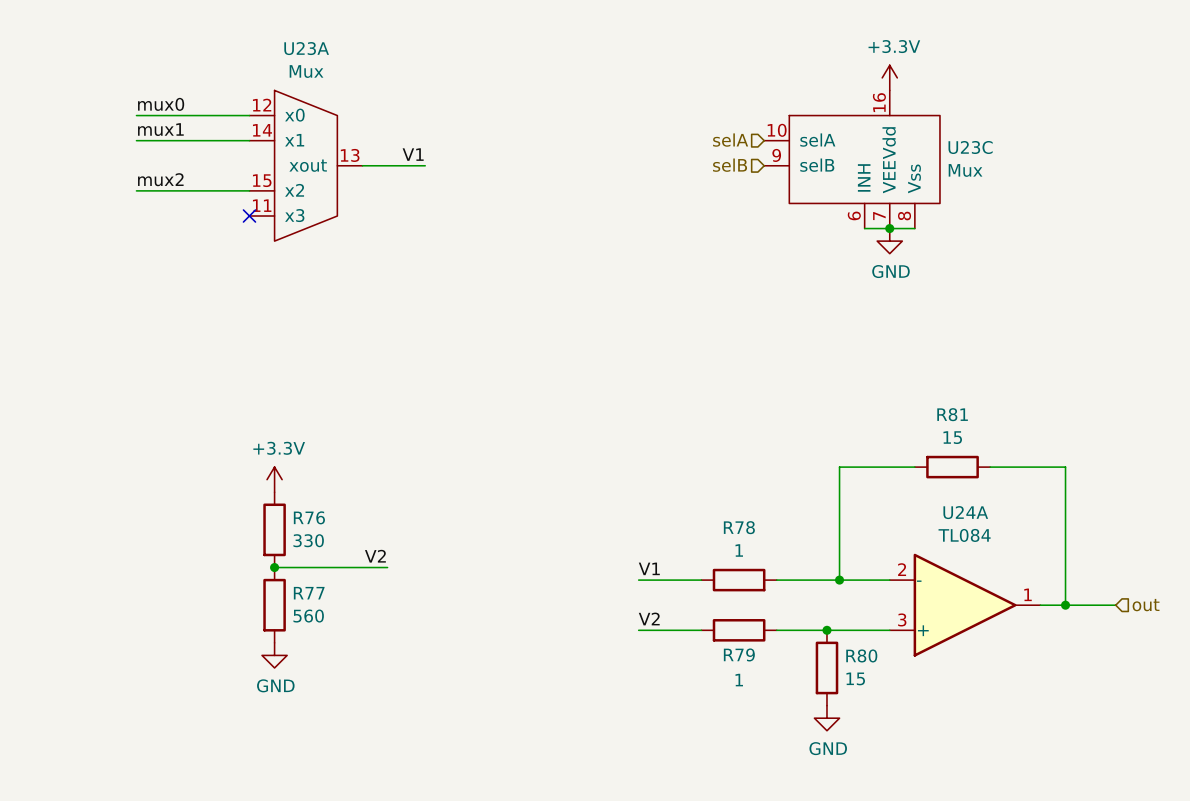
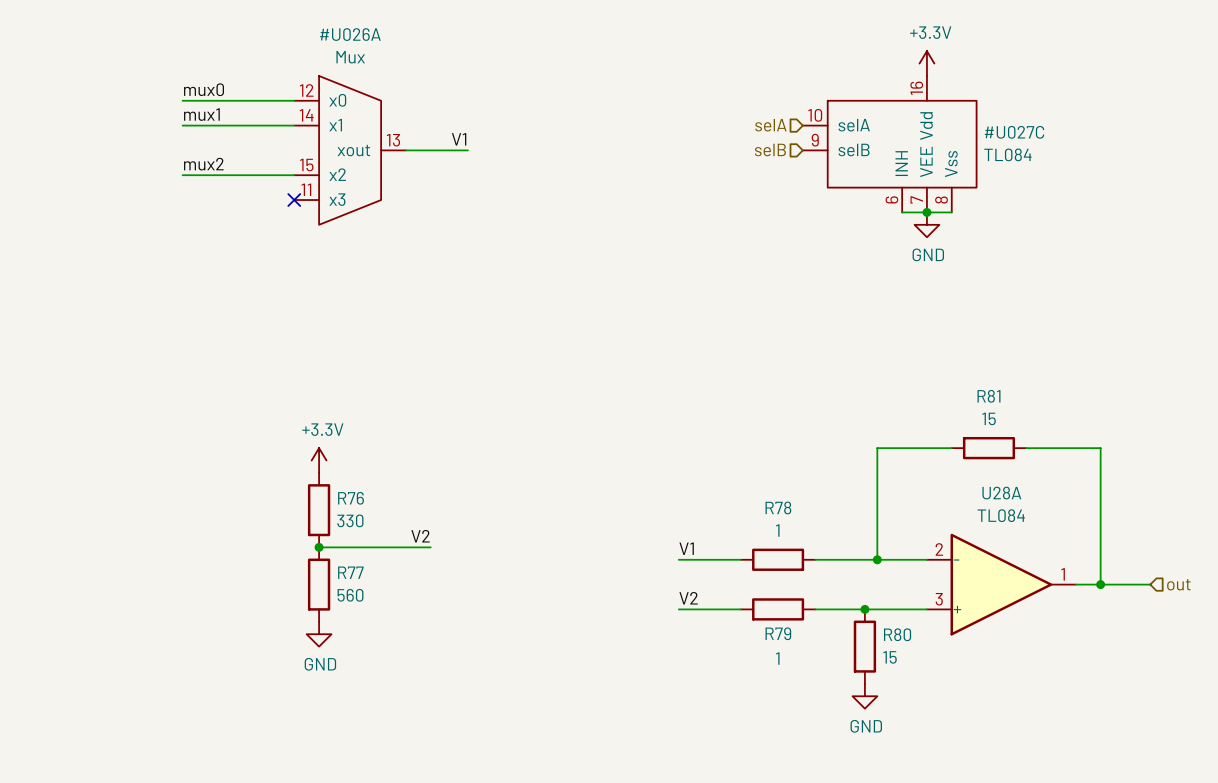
U23C: Mux (852, 159) -> none
#U027C: none -> TL084 (889, 144)
U23A: Mux (305, 165) -> none
#U026A: none -> Mux (350, 150)
U24A name: U24A (965, 512) -> U28A (1001, 493)

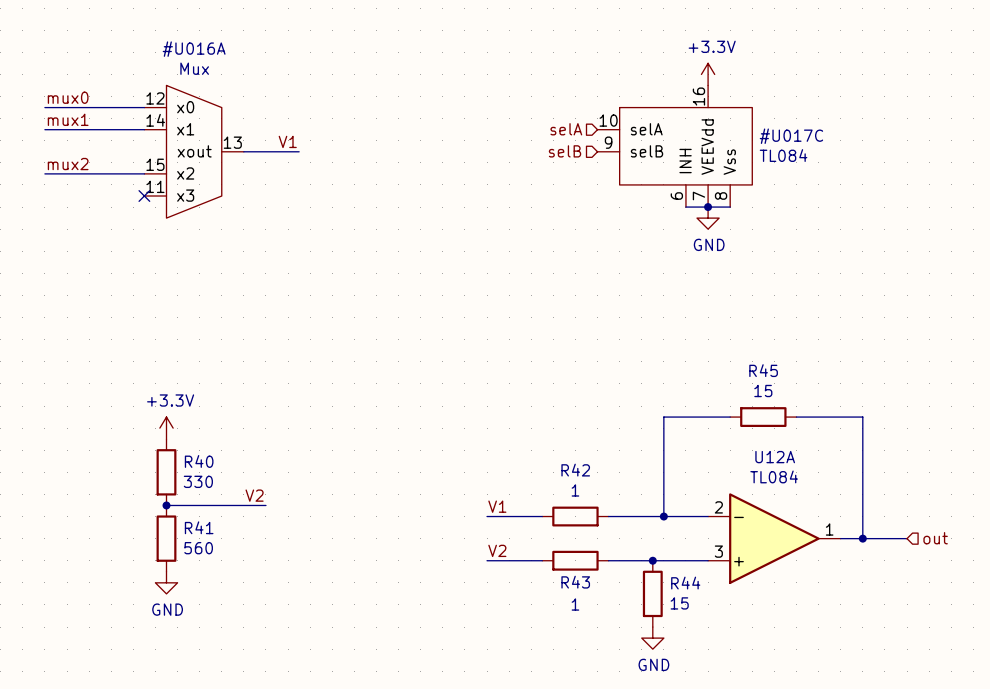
#U026A name: #U026A (350, 34) -> #U016A (194, 49)
#U027C name: #U027C (1014, 132) -> #U017C (791, 136)
R81 name: R81 (989, 396) -> R45 (763, 370)
U28A name: U28A (1001, 493) -> U12A (775, 457)
R76 name: R76 (351, 498) -> R40 (199, 461)
R78 name: R78 (778, 507) -> R42 (575, 470)
R77 name: R77 (350, 572) -> R41 (199, 527)
R79 name: R79 (778, 633) -> R43 (575, 582)
R80 name: R80 (897, 634) -> R44 (685, 583)

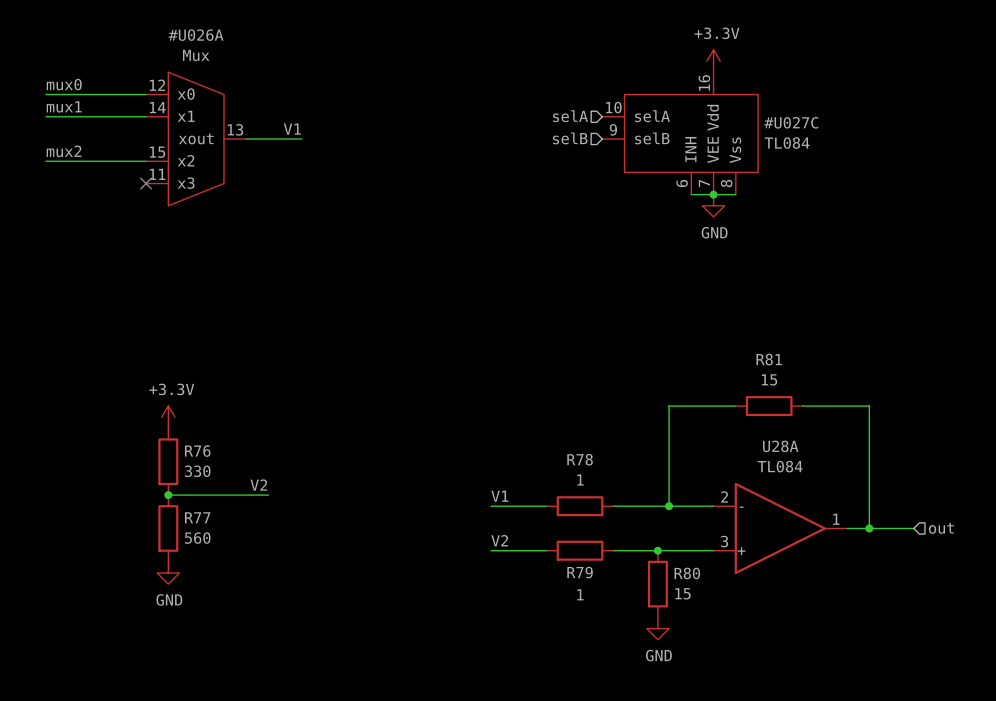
#U016A name: #U016A (194, 49) -> #U026A (196, 35)
#U017C name: #U017C (791, 136) -> #U027C (791, 122)
R45 name: R45 (763, 370) -> R81 (769, 359)
U12A name: U12A (775, 457) -> U28A (780, 446)
R40 name: R40 (199, 461) -> R76 (197, 451)
R42 name: R42 (575, 470) -> R78 (580, 459)
R41 name: R41 (199, 527) -> R77 (197, 517)
R43 name: R43 (575, 582) -> R79 (580, 572)
R44 name: R44 (685, 583) -> R80 (687, 573)

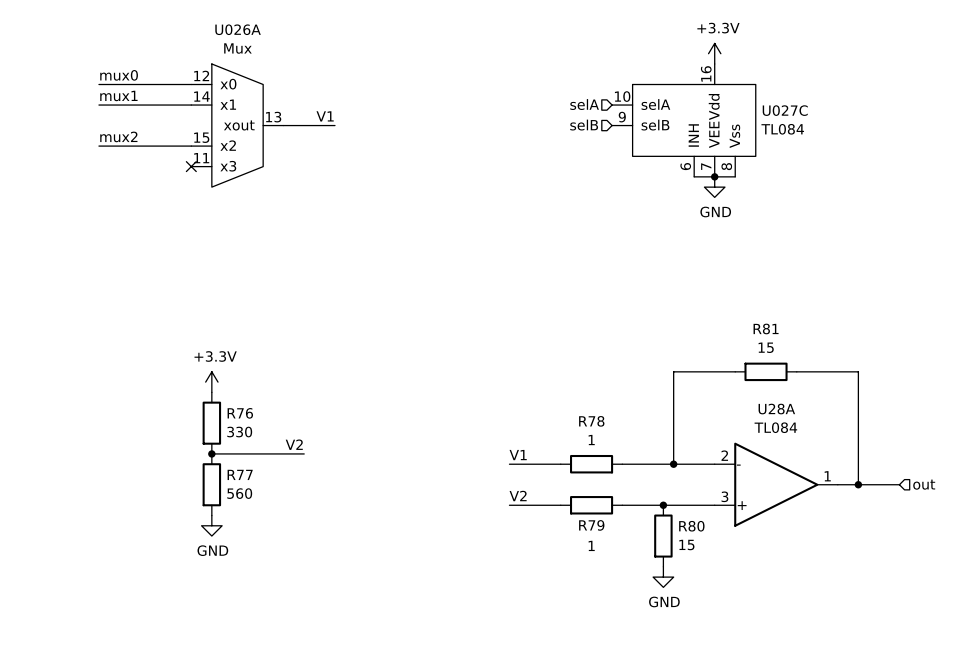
#U027C: TL084 (680, 133) -> none
U027C: none -> TL084 (683, 120)
#U026A: Mux (196, 139) -> none
U026A: none -> Mux (237, 125)

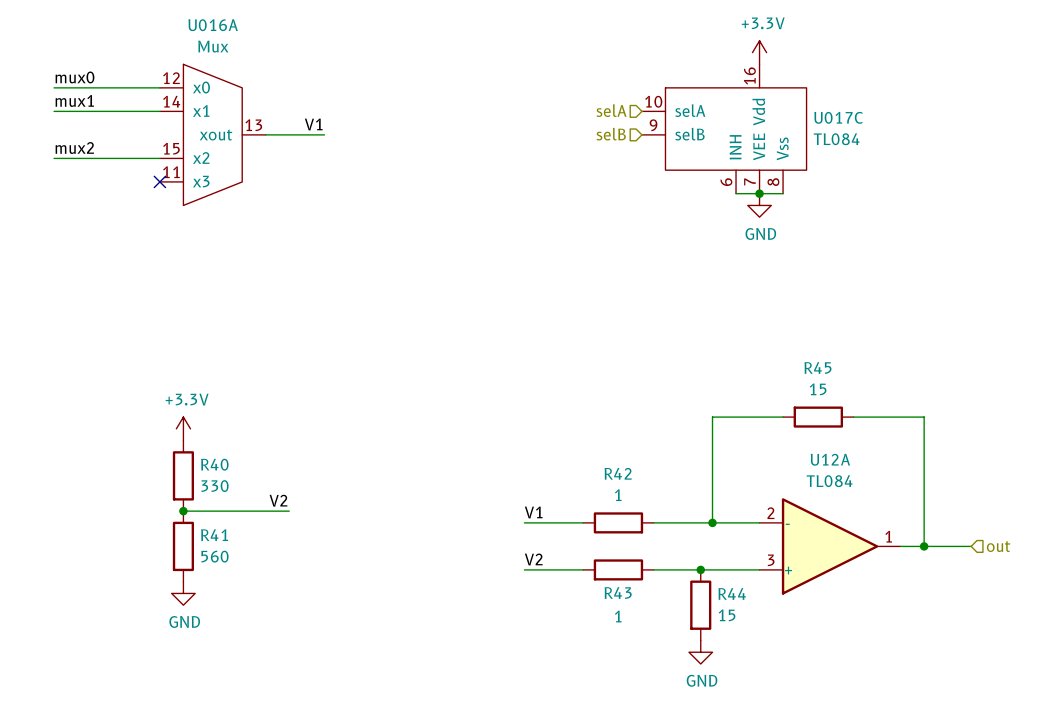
U026A name: U026A (238, 29) -> U016A (213, 25)
U027C name: U027C (785, 110) -> U017C (838, 117)
R81 name: R81 (766, 328) -> R45 (817, 367)
U28A name: U28A (776, 409) -> U12A (830, 459)
R76 name: R76 (240, 413) -> R40 (214, 464)
R78 name: R78 (591, 421) -> R42 (618, 473)
R77 name: R77 (240, 474) -> R41 (214, 535)
R79 name: R79 (591, 525) -> R43 (618, 593)
R80 name: R80 (691, 526) -> R44 (732, 593)

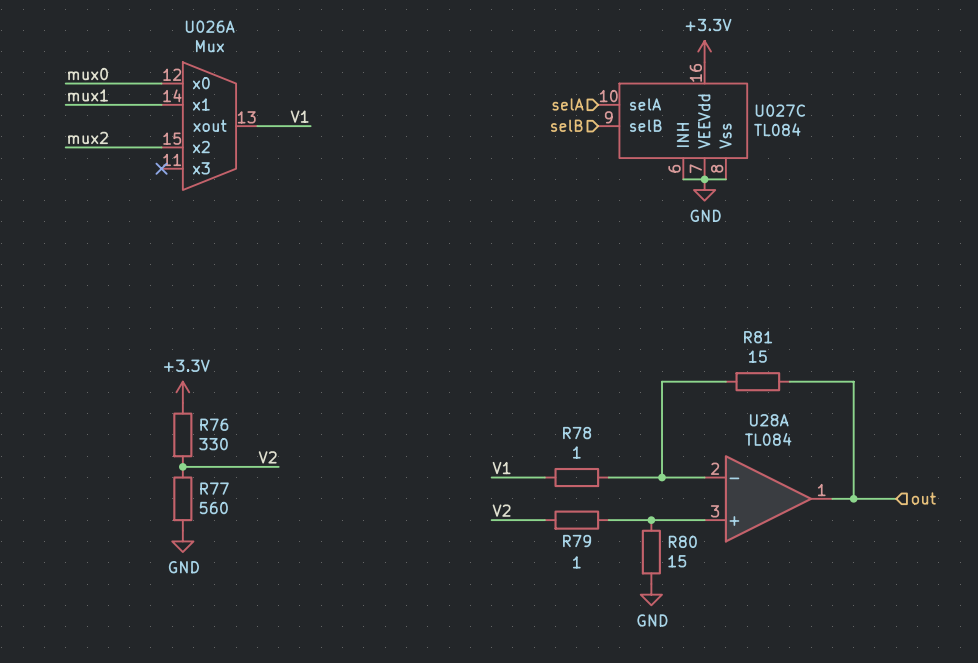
U016A name: U016A (213, 25) -> U026A (210, 26)
U017C name: U017C (838, 117) -> U027C (780, 110)
R45 name: R45 (817, 367) -> R81 (758, 337)
U12A name: U12A (830, 459) -> U28A (769, 420)
R40 name: R40 (214, 464) -> R76 (214, 424)
R42 name: R42 (618, 473) -> R78 (577, 433)
R41 name: R41 (214, 535) -> R77 (214, 488)
R43 name: R43 (618, 593) -> R79 (577, 541)
R44 name: R44 (732, 593) -> R80 (682, 541)

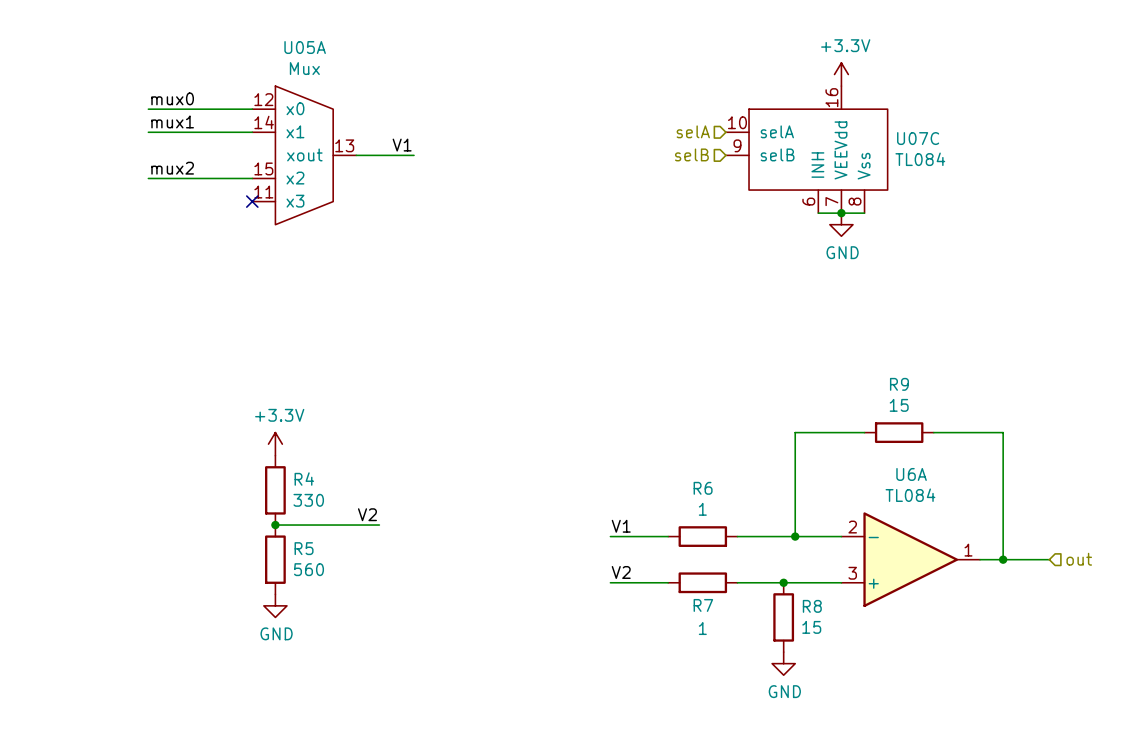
U026A name: U026A (210, 26) -> U05A (305, 47)
U027C name: U027C (780, 110) -> U07C (918, 138)
R81 name: R81 (758, 337) -> R9 (899, 384)
U28A name: U28A (769, 420) -> U6A (911, 474)
R76 name: R76 (214, 424) -> R4 (304, 479)
R78 name: R78 (577, 433) -> R6 (703, 488)
R77 name: R77 (214, 488) -> R5 (304, 548)
R79 name: R79 (577, 541) -> R7 (703, 605)
R80 name: R80 (682, 541) -> R8 (812, 606)

